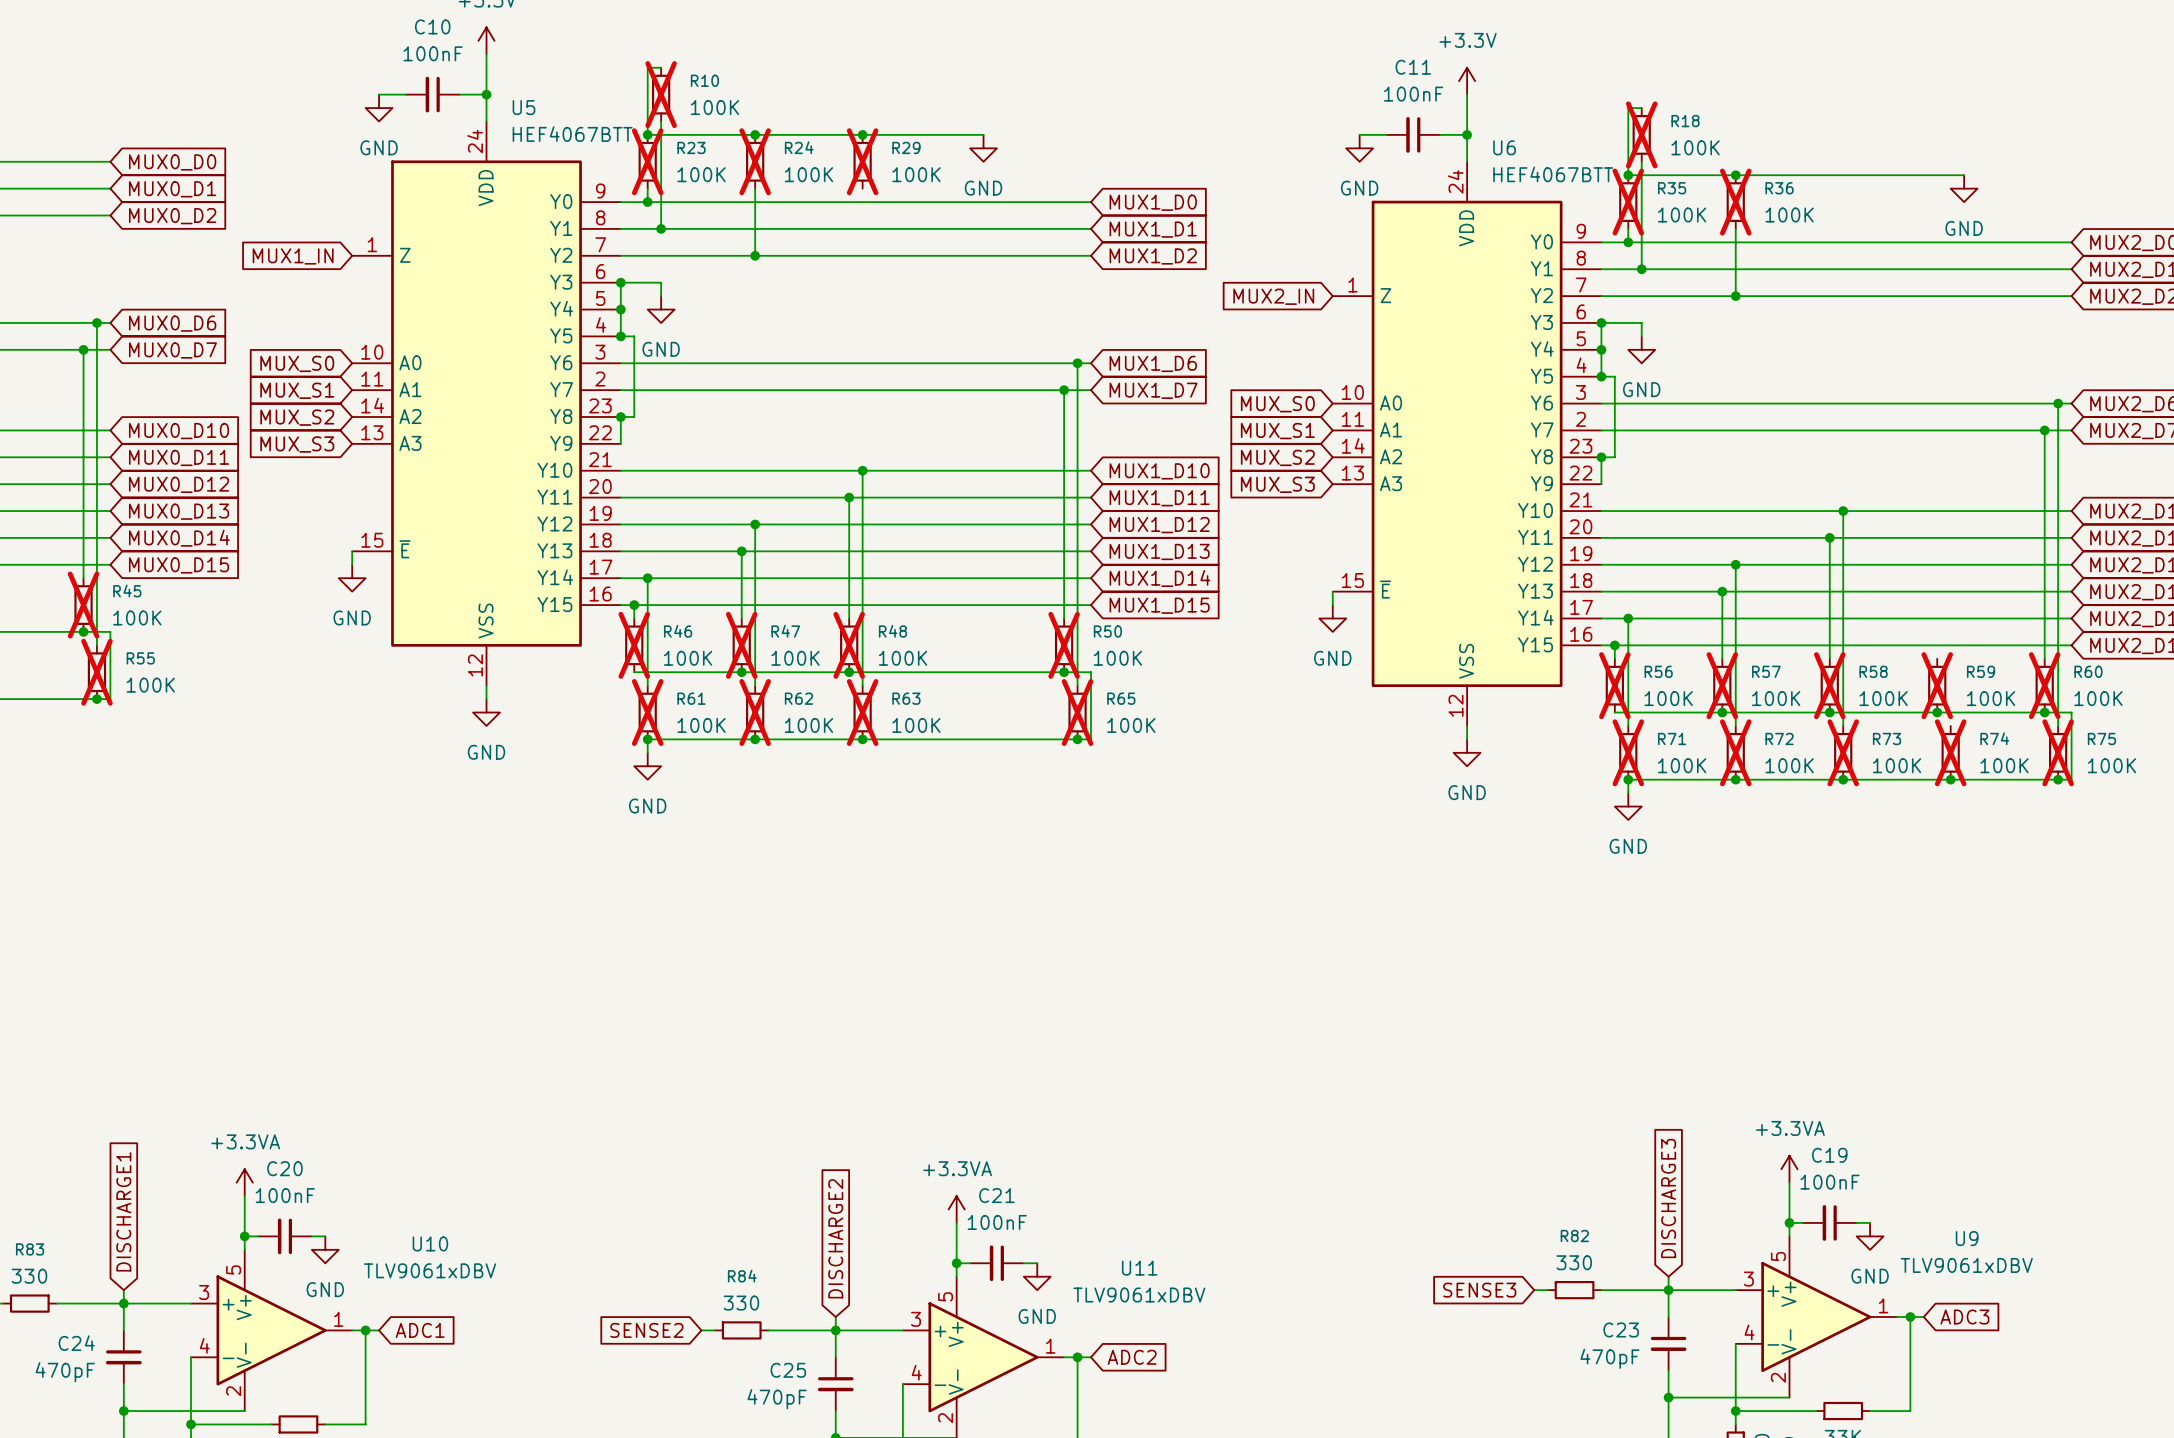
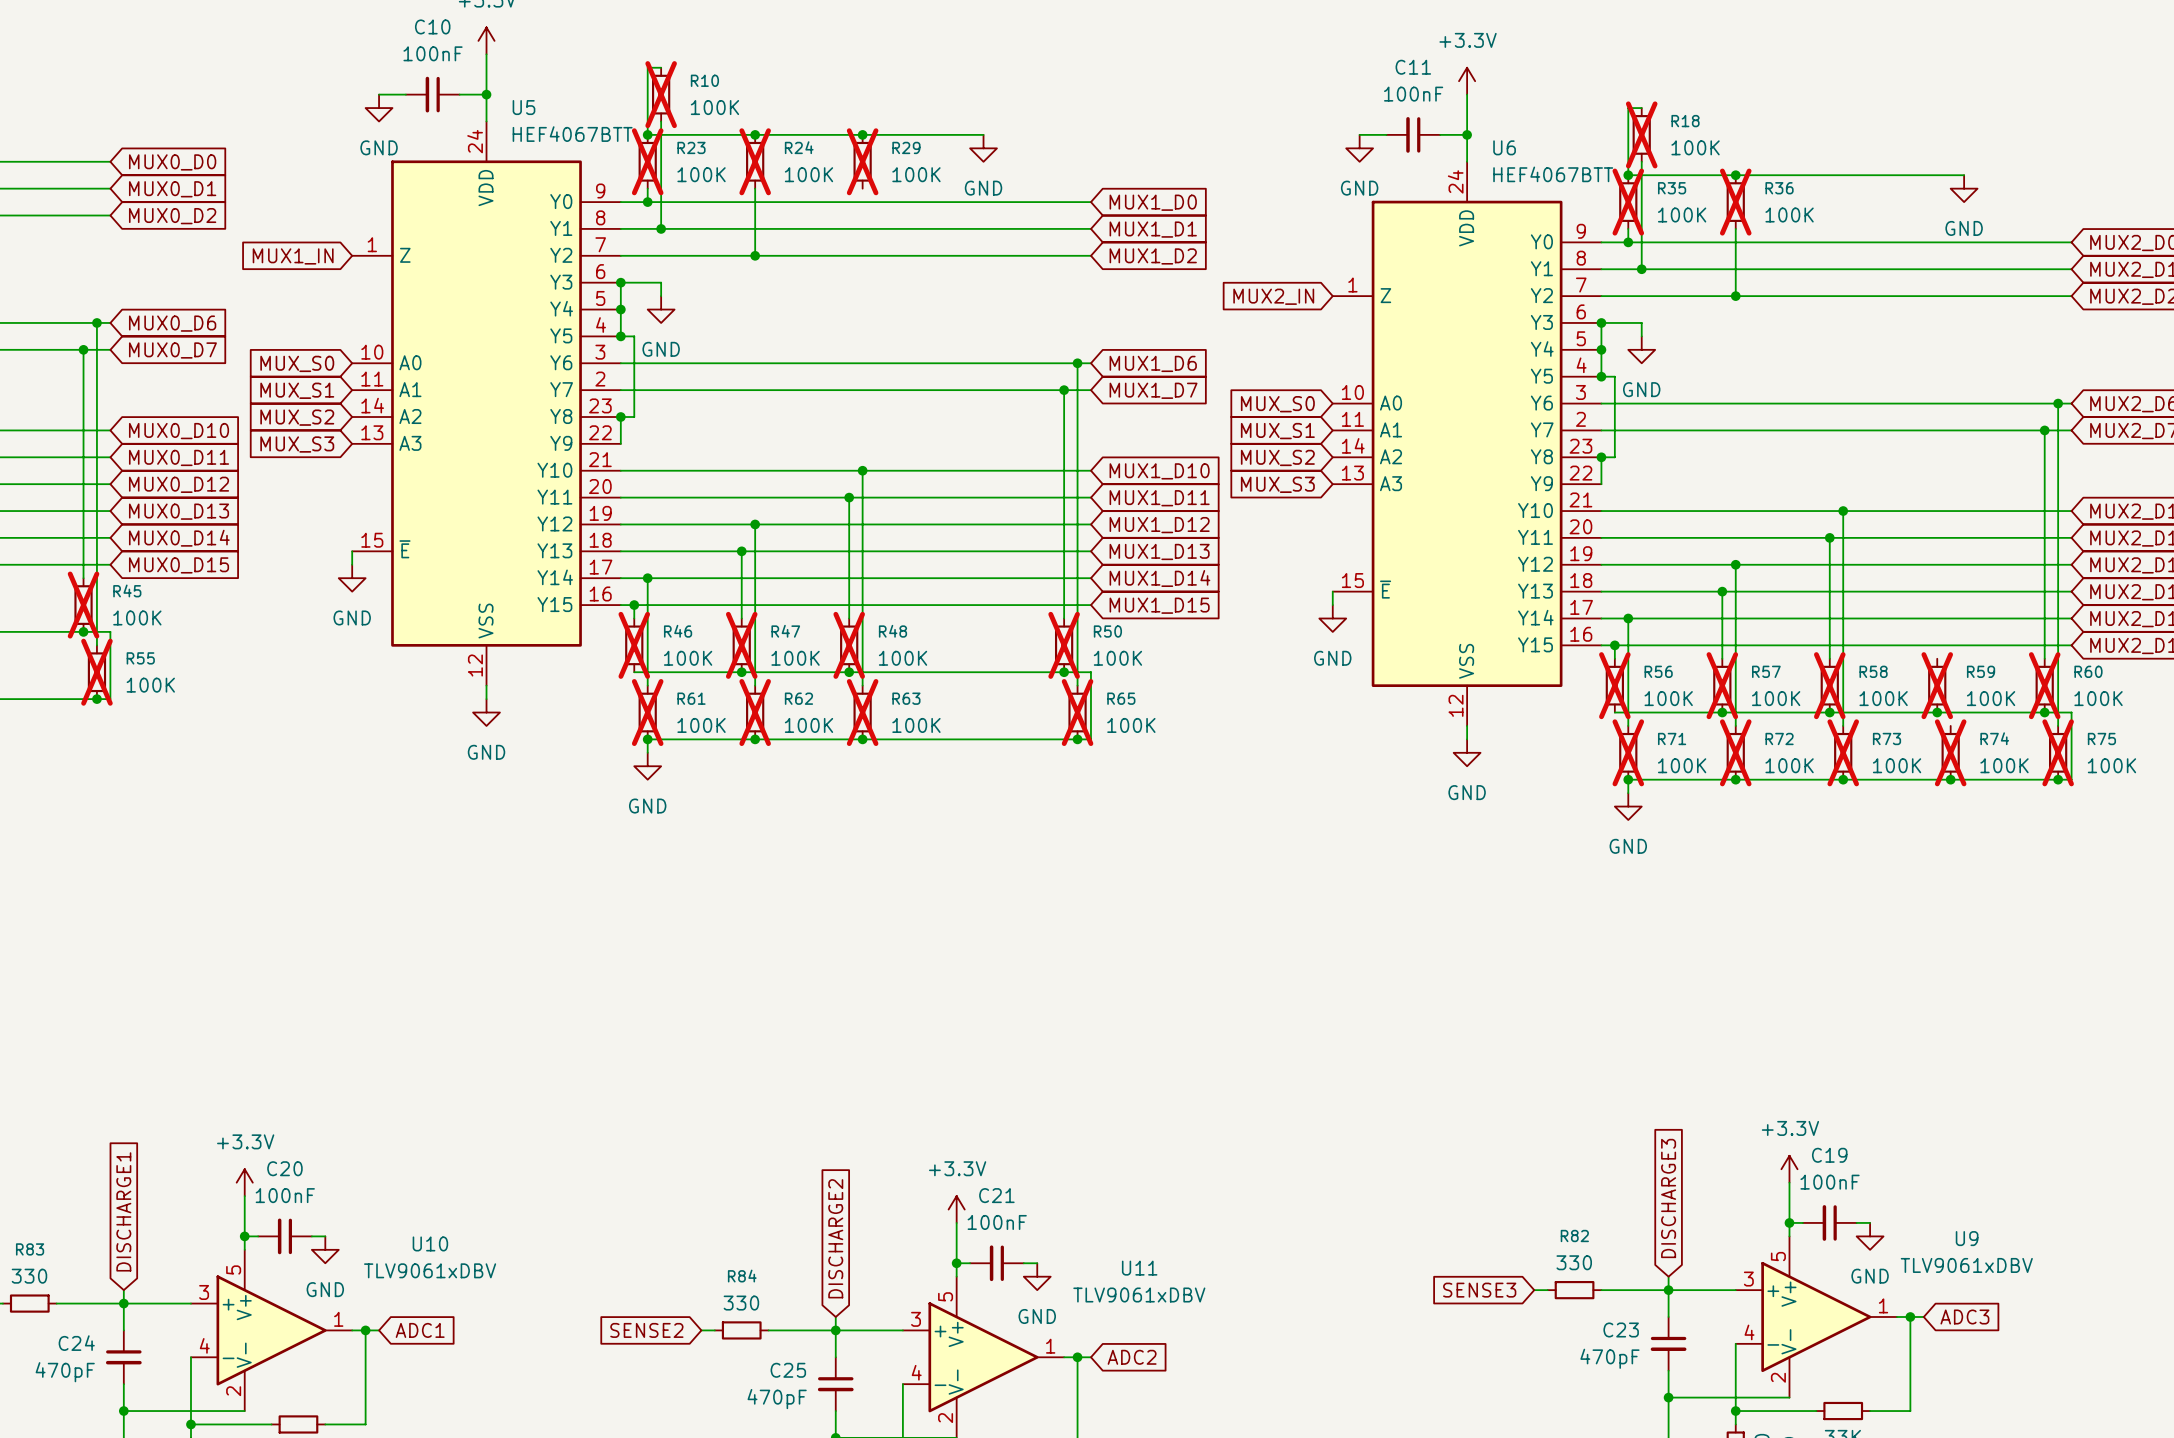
power symbol: +3.3VA (1789, 1169) -> +3.3V (1789, 1169)
power symbol: +3.3VA (244, 1182) -> +3.3V (244, 1182)
power symbol: +3.3VA (956, 1209) -> +3.3V (956, 1209)

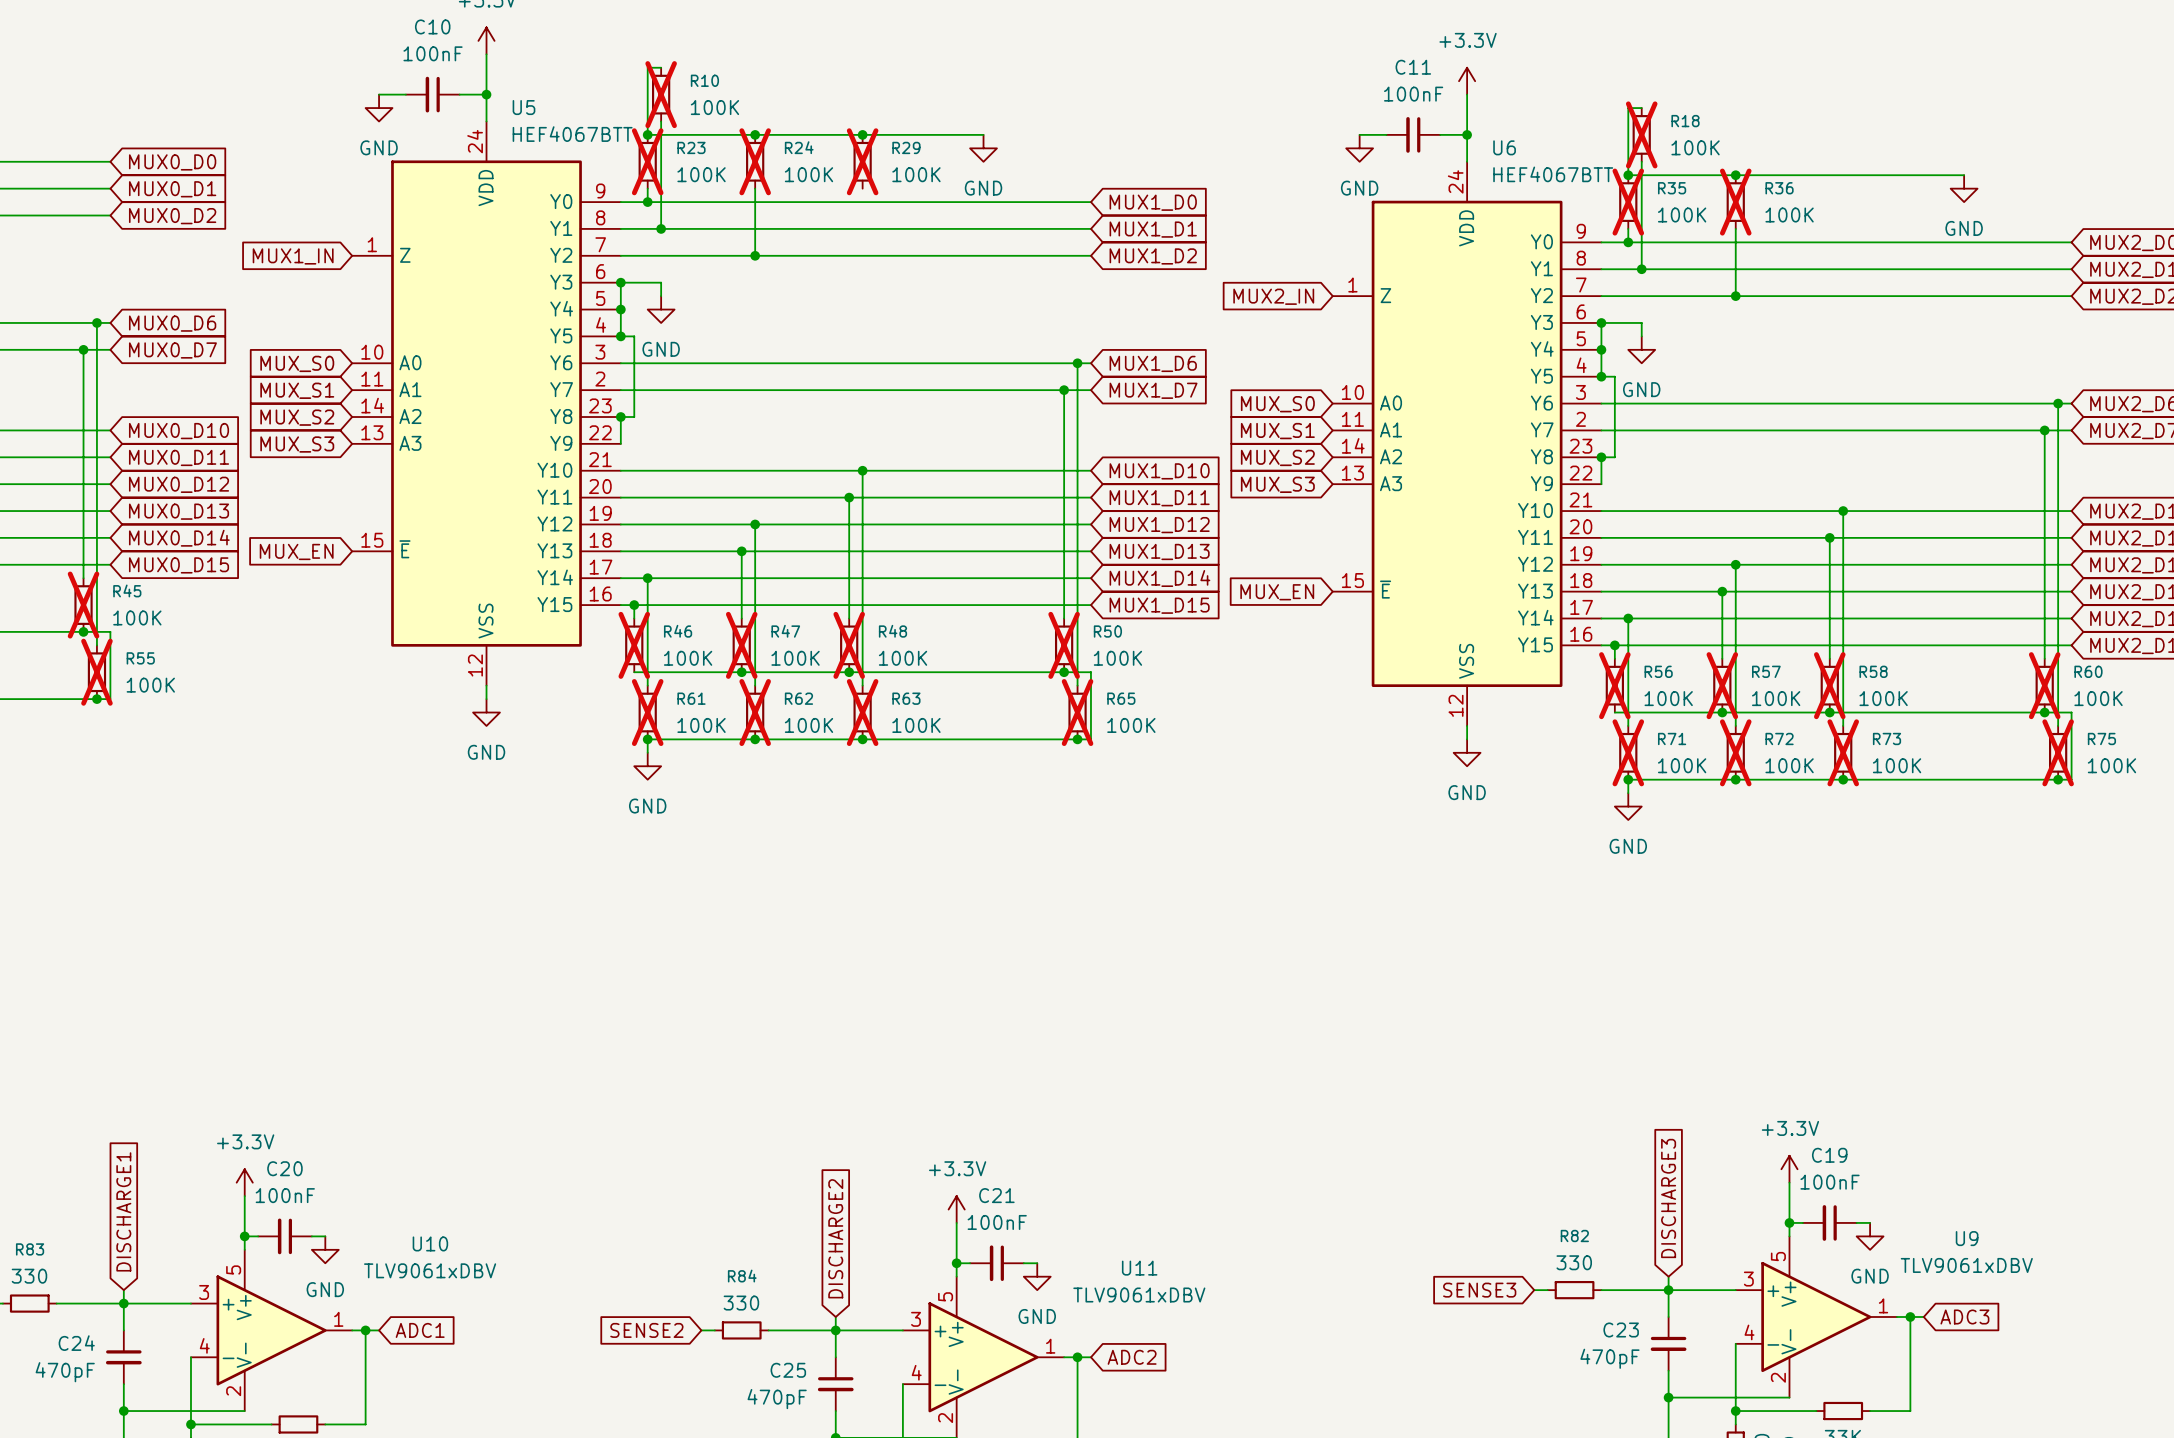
global label: none -> MUX_EN (296, 551)
wire: (352, 551) (352, 564) -> none
power symbol: GND (352, 578) -> none
wire: (1332, 591) (1332, 605) -> none
global label: none -> MUX_EN (1277, 592)
power symbol: GND (1332, 618) -> none
R59: 100K (1937, 685) -> none
junction: (1937, 712) -> none
R74: 100K (1950, 752) -> none
junction: (1950, 779) -> none

